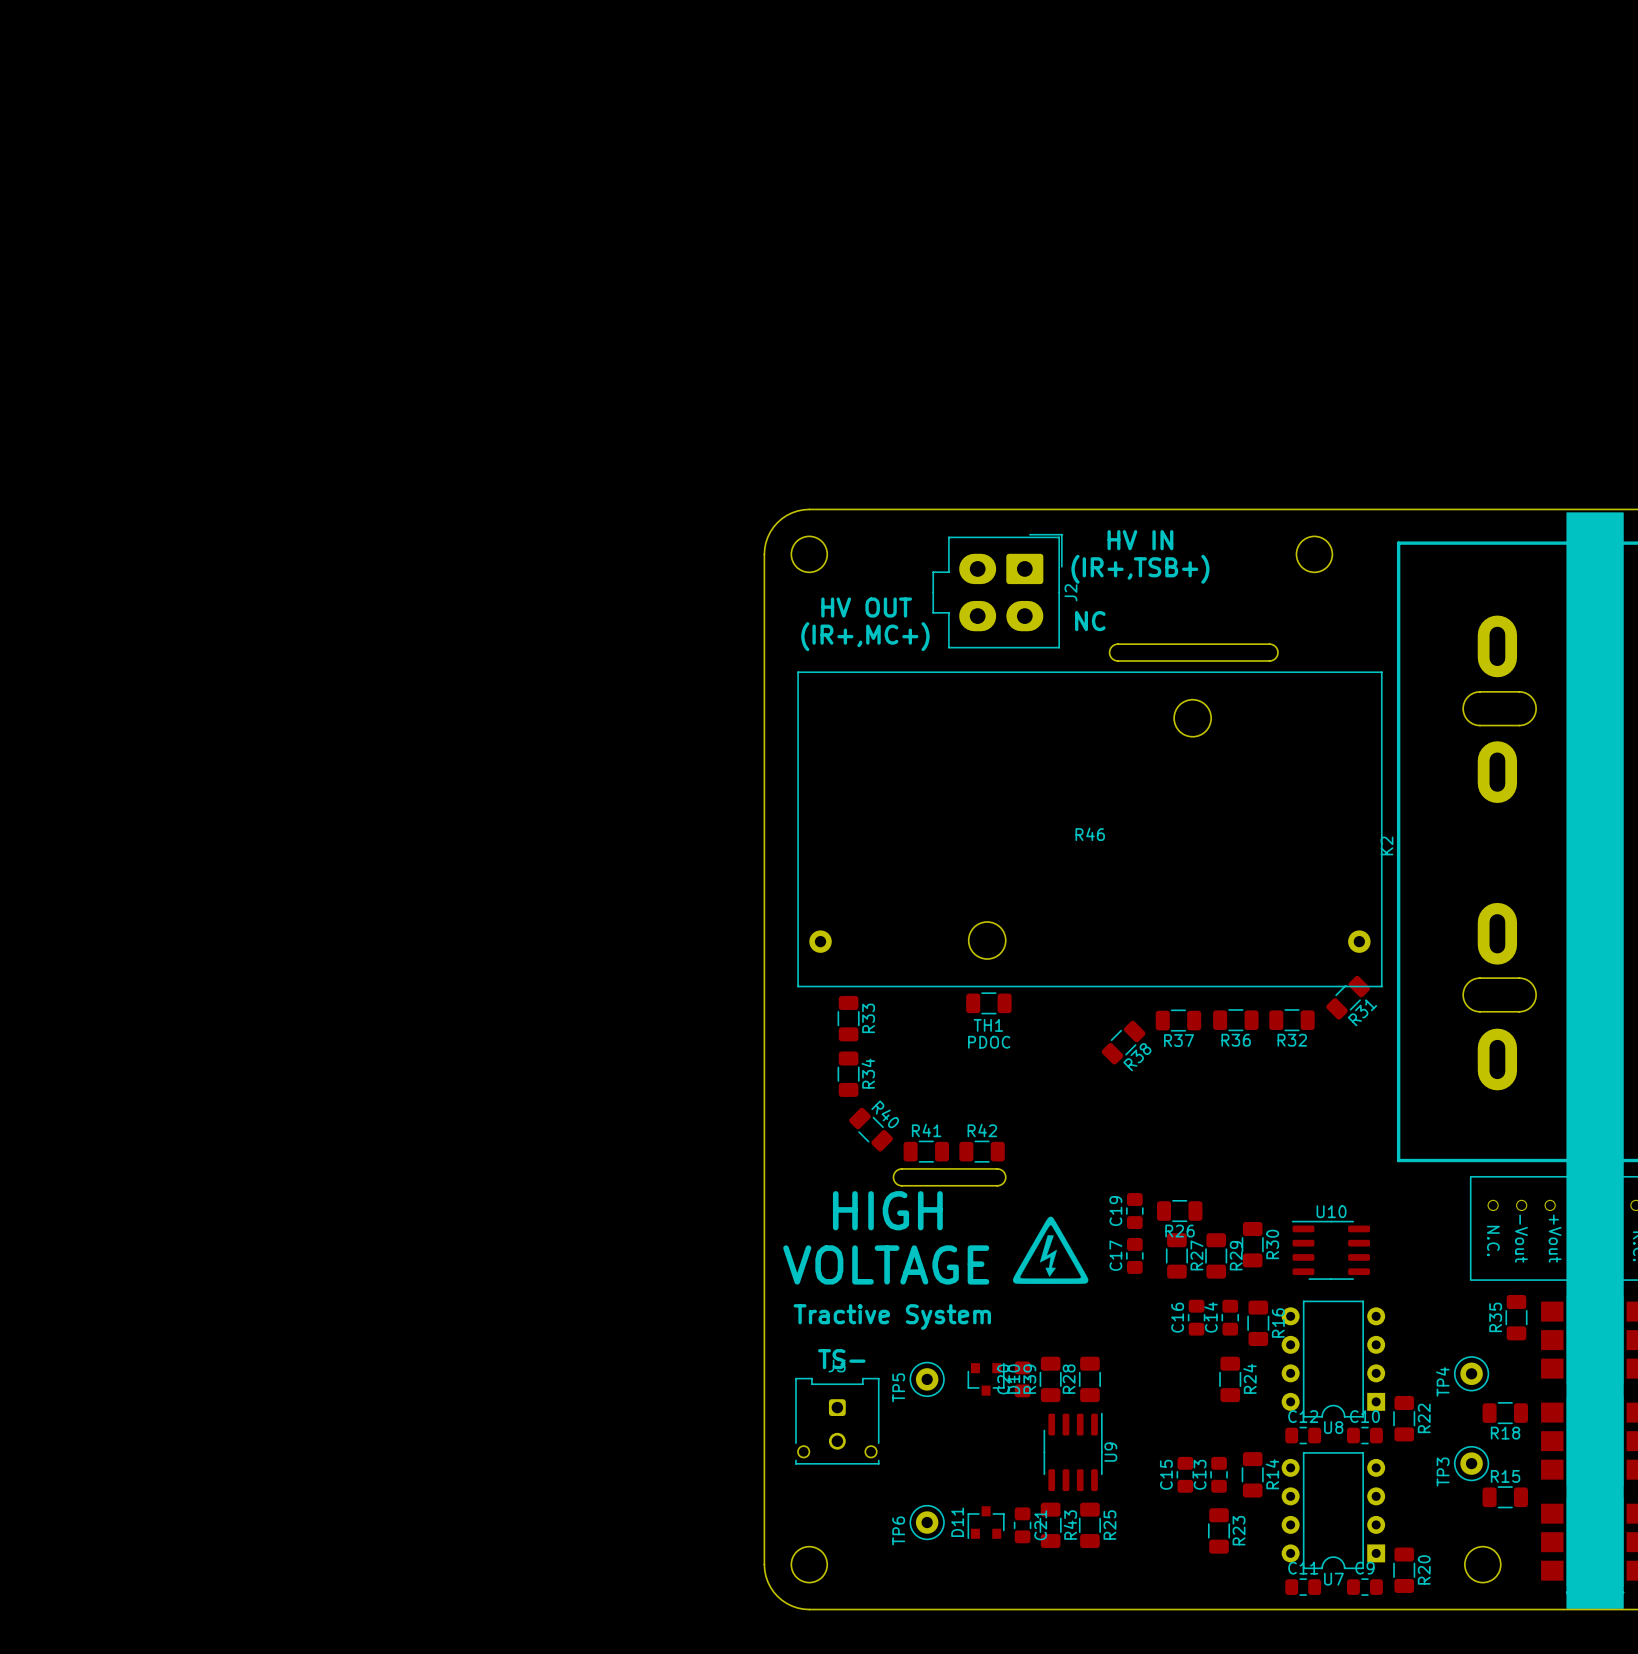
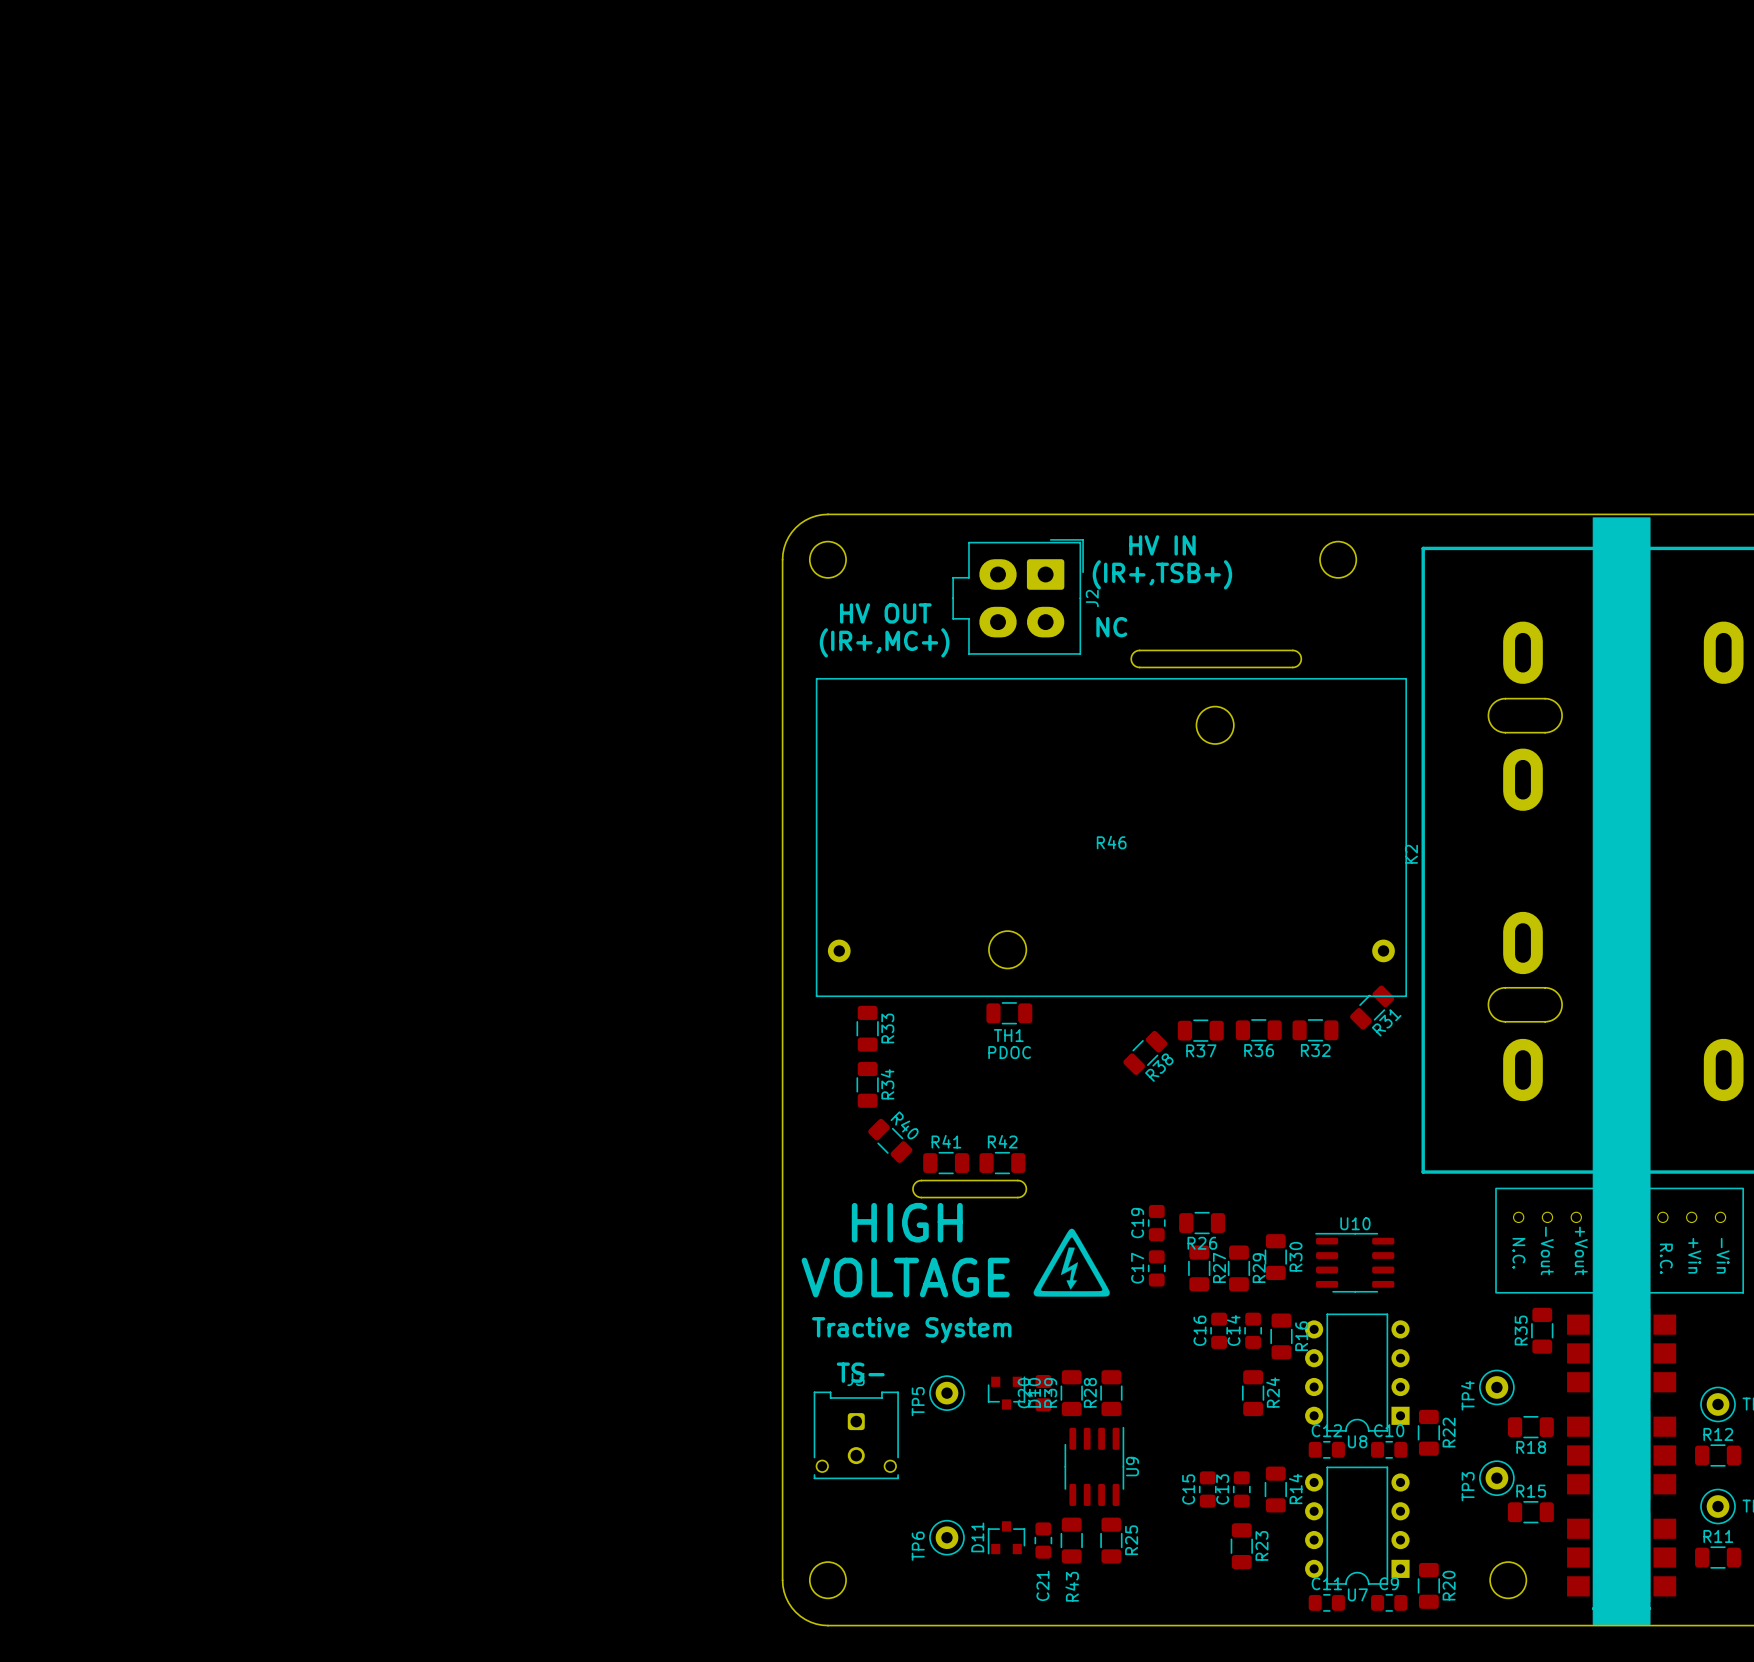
C21 name position: C21 (1040, 1525) -> C21 (1042, 1585)
R43 name position: R43 (1070, 1525) -> R43 (1072, 1586)

